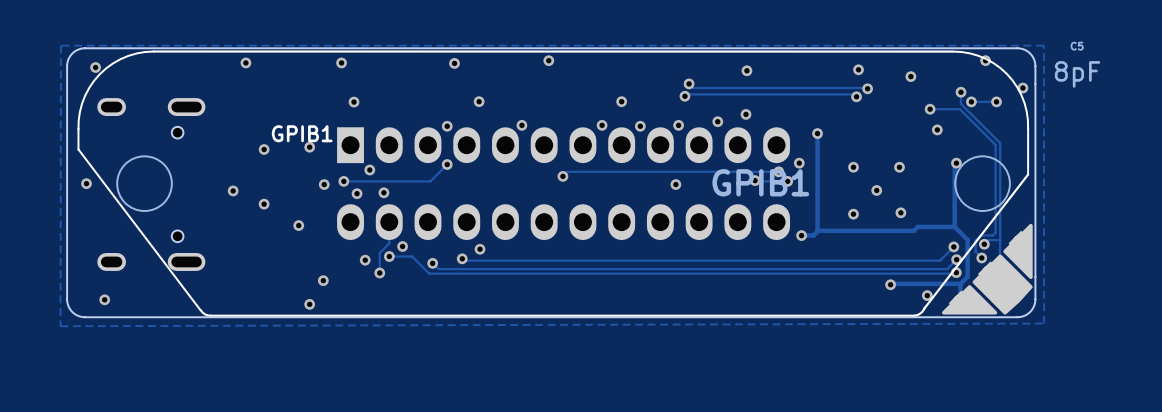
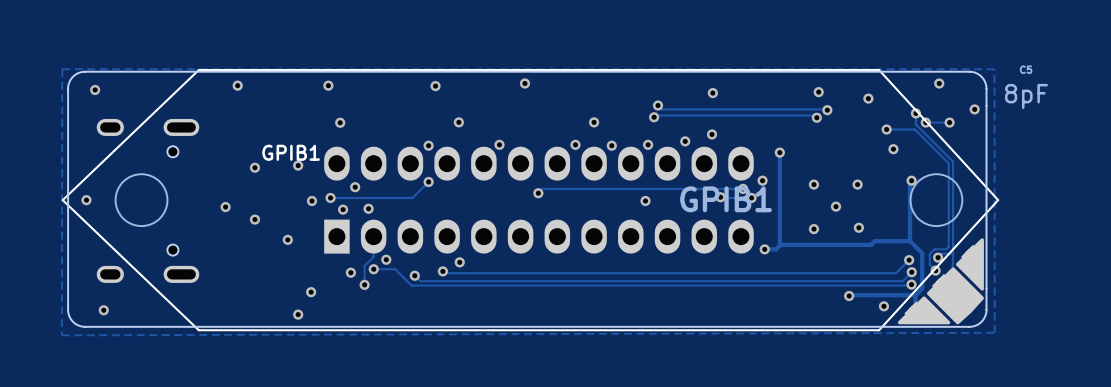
GPIB1 footprint: [77, 50, 1030, 317] -> [61, 69, 1000, 332]

